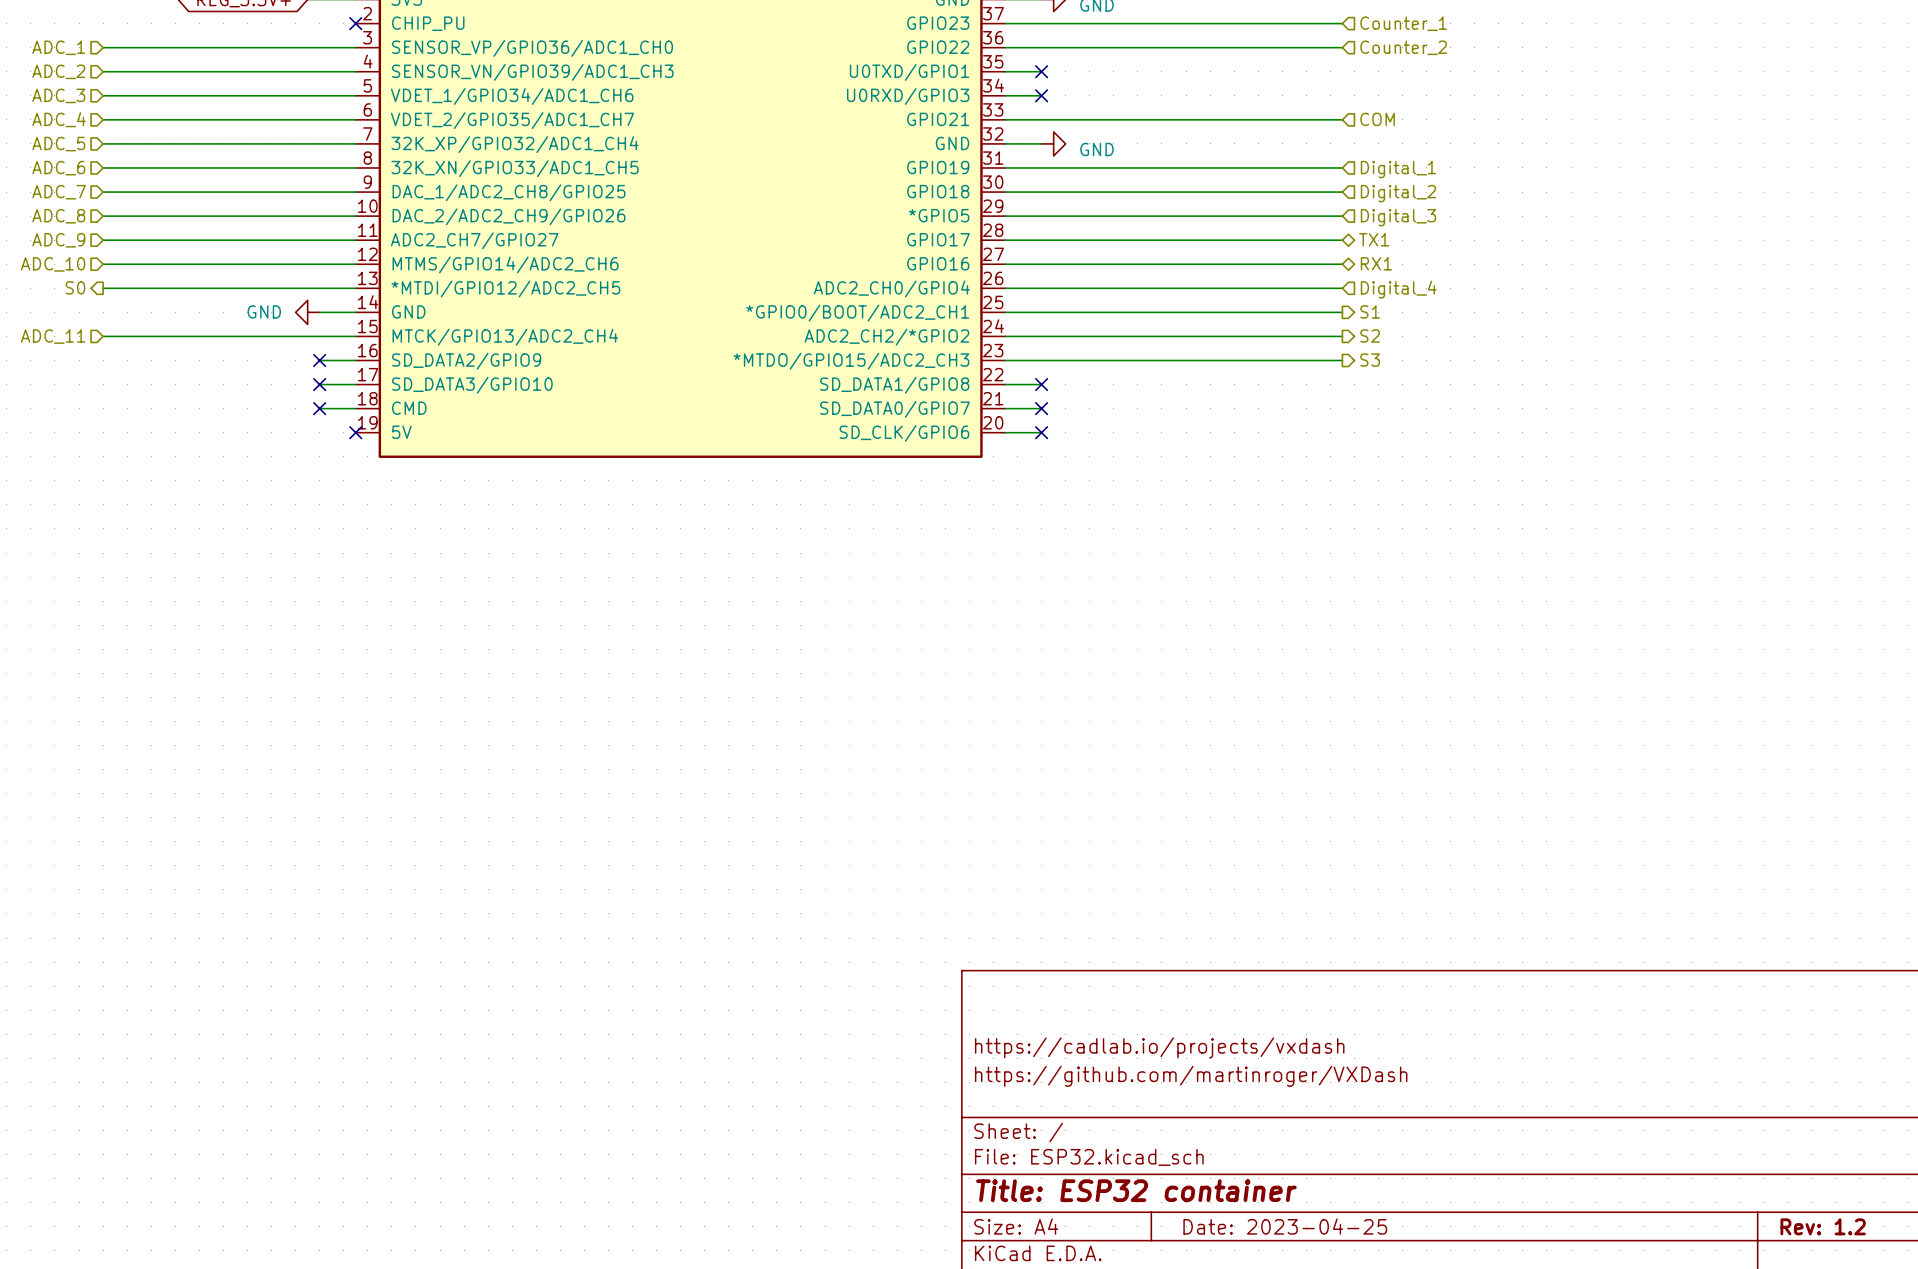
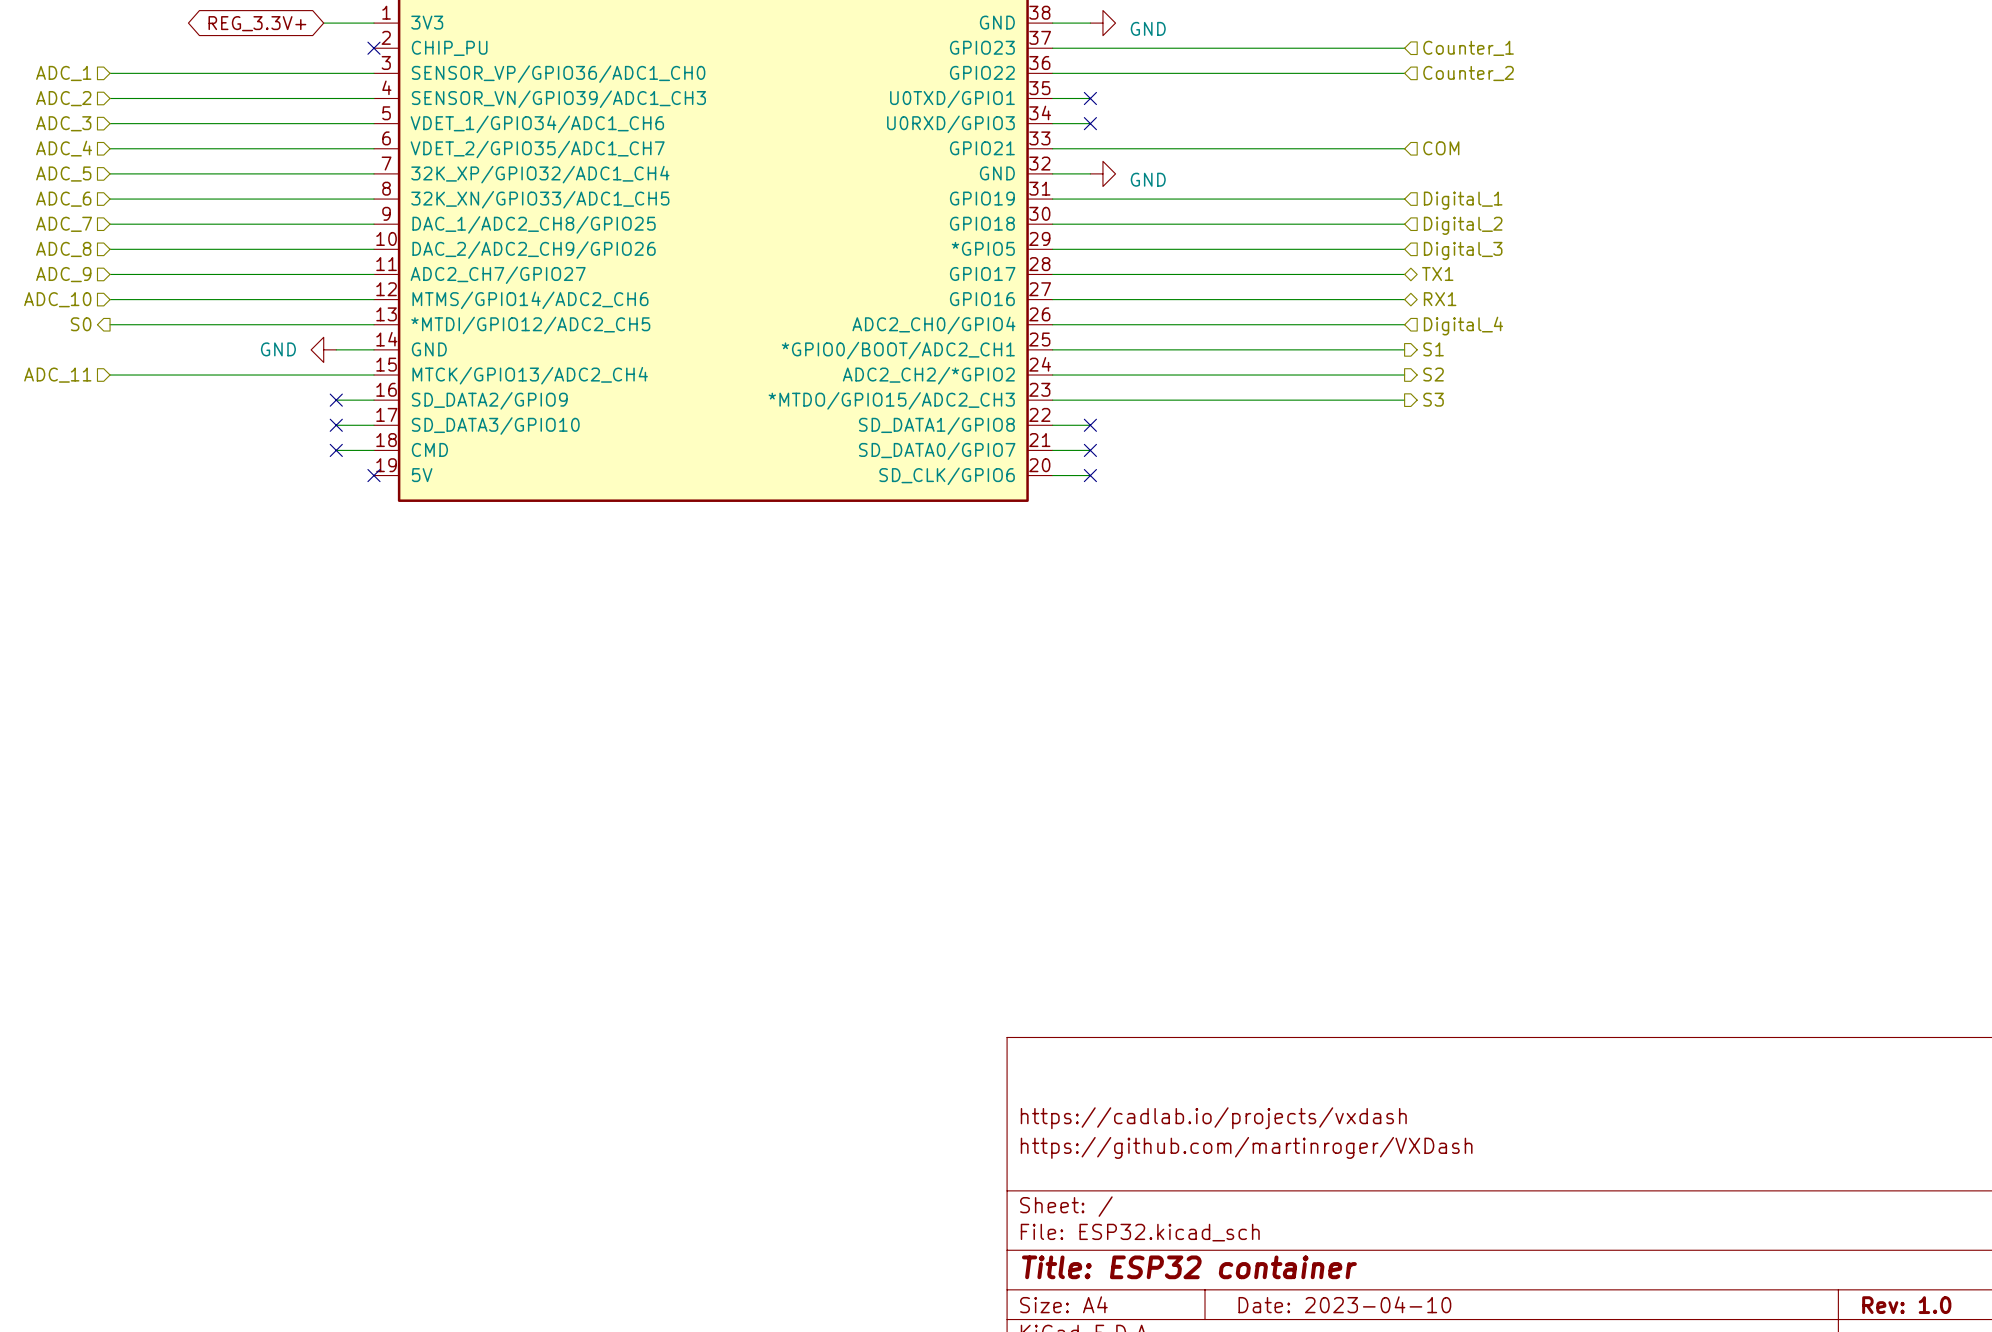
title block: Date: 2023-04-25 (1285, 1226) -> Date: 2023-04-10 (1344, 1304)
title block: Rev: 1.2 (1823, 1226) -> Rev: 1.0 (1906, 1305)

